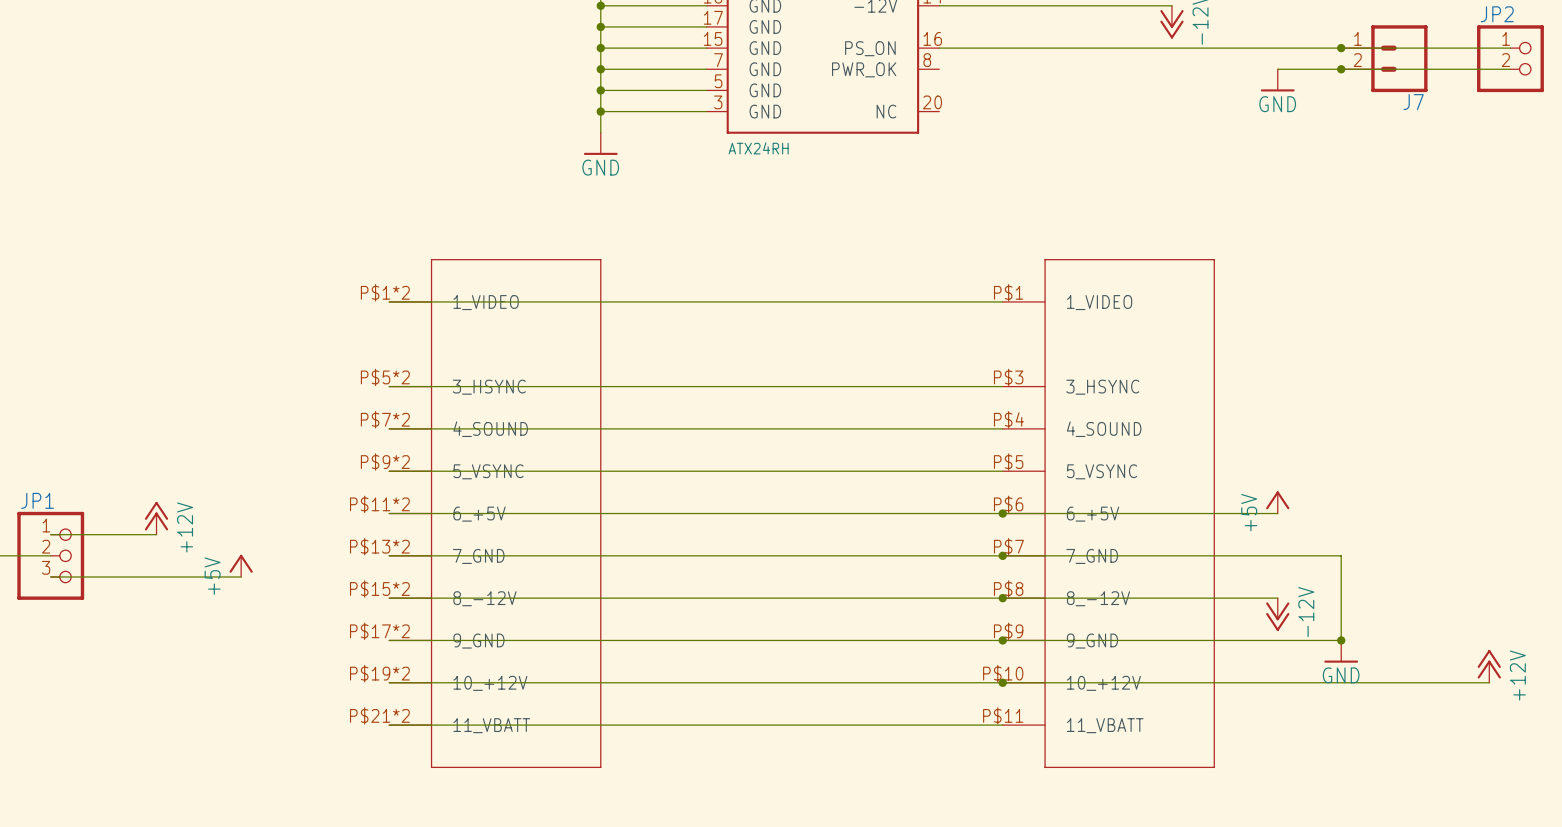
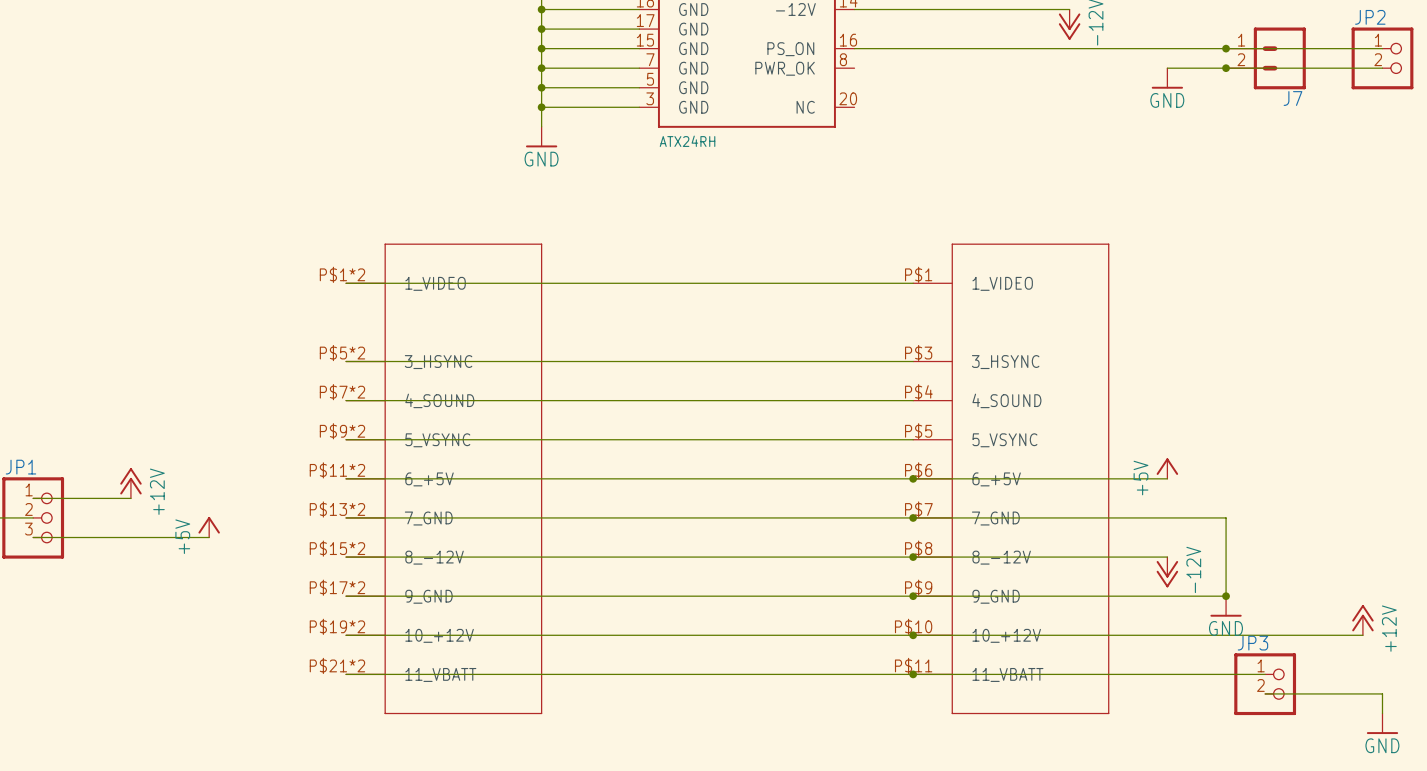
wire: none -> (913, 674) (1265, 674)
junction: none -> (913, 674)
JP3: none -> (1265, 684)
wire: none -> (1265, 693) (1382, 693) (1382, 713)
power symbol: none -> GND (1382, 723)

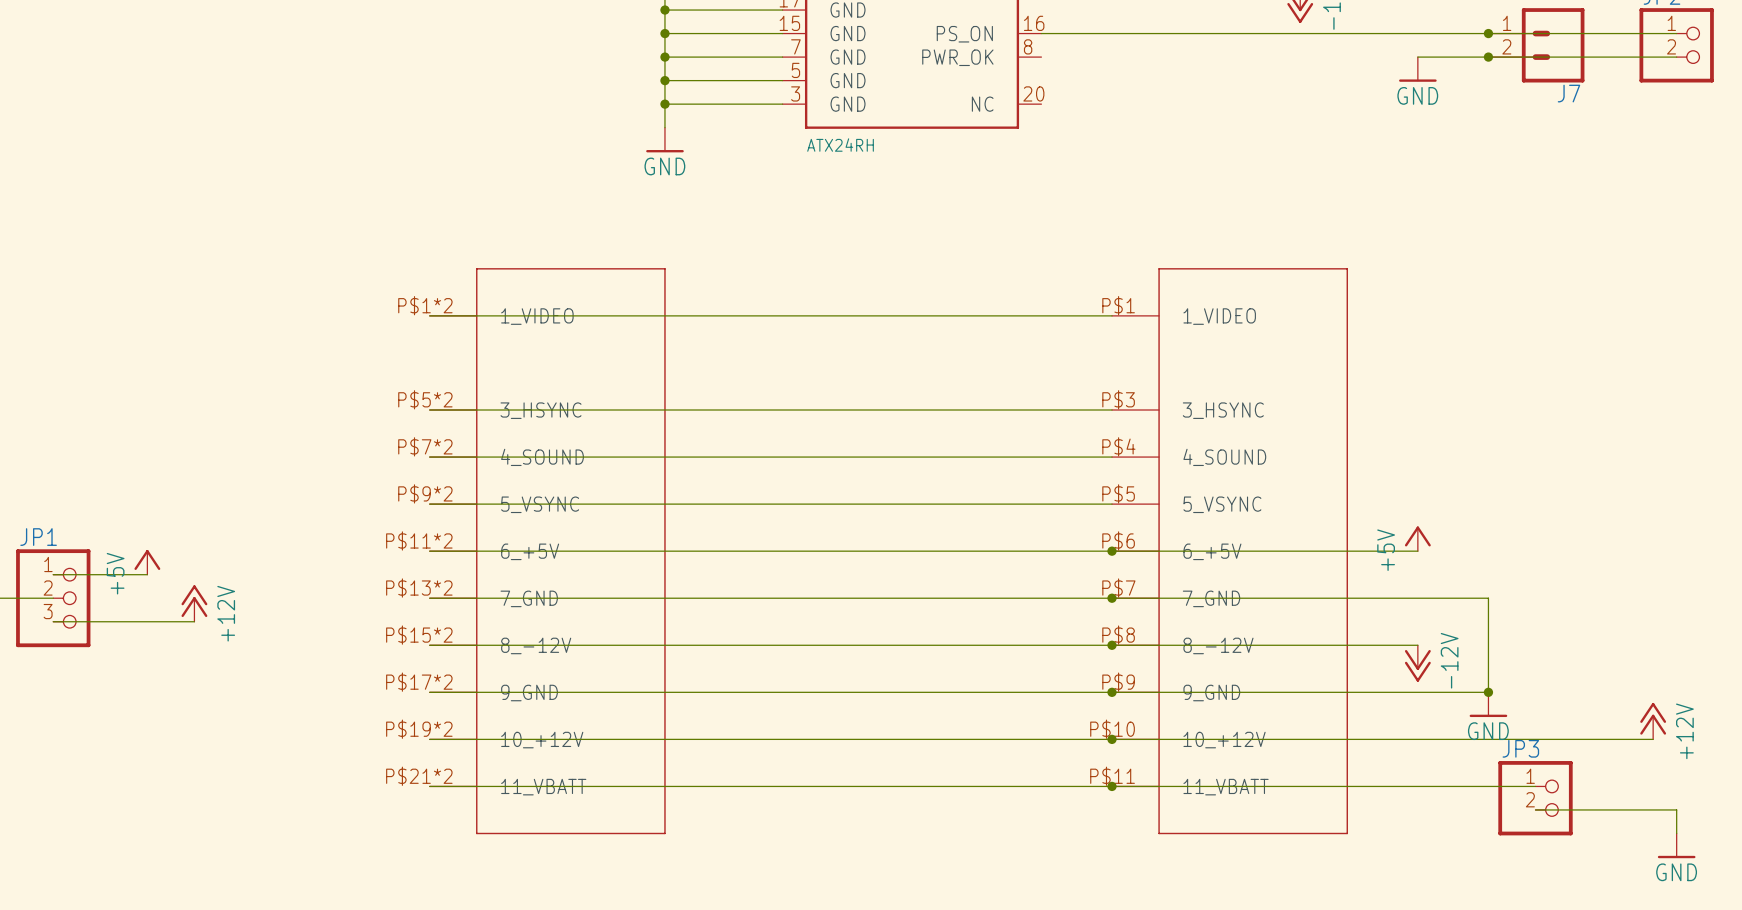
power symbol position: +12V (130, 483) -> +12V (194, 603)
wire: (111, 498) (130, 498) -> none
power symbol position: +5V (209, 527) -> +5V (147, 562)
wire: (150, 537) (209, 537) -> none

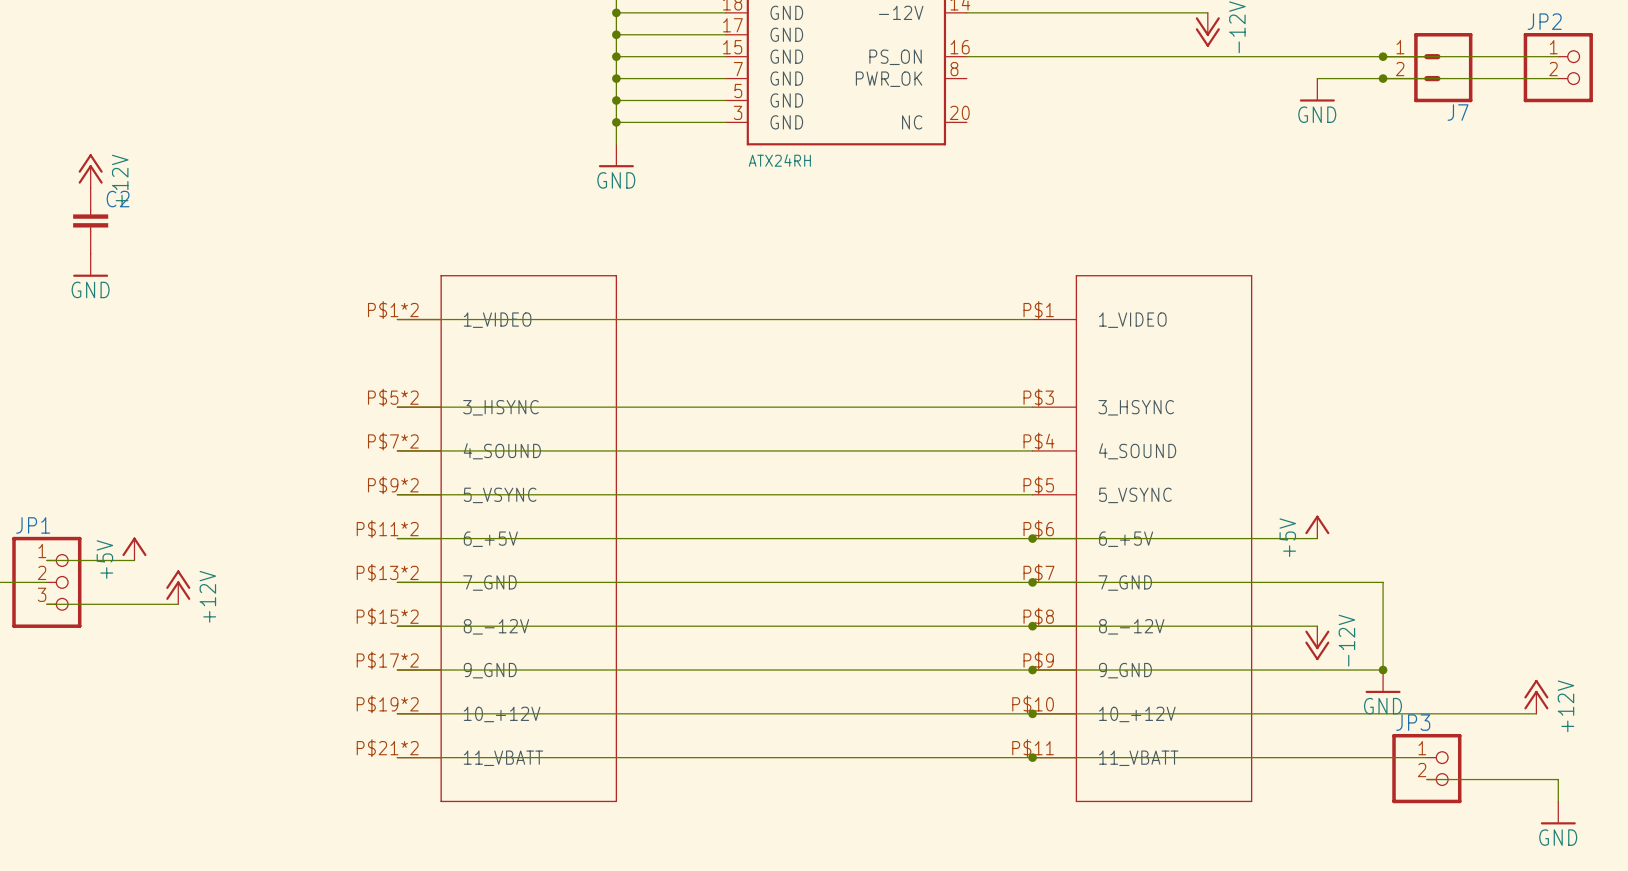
power symbol: none -> +12V (90, 171)
C2: none -> (90, 220)
power symbol: none -> GND (90, 265)

